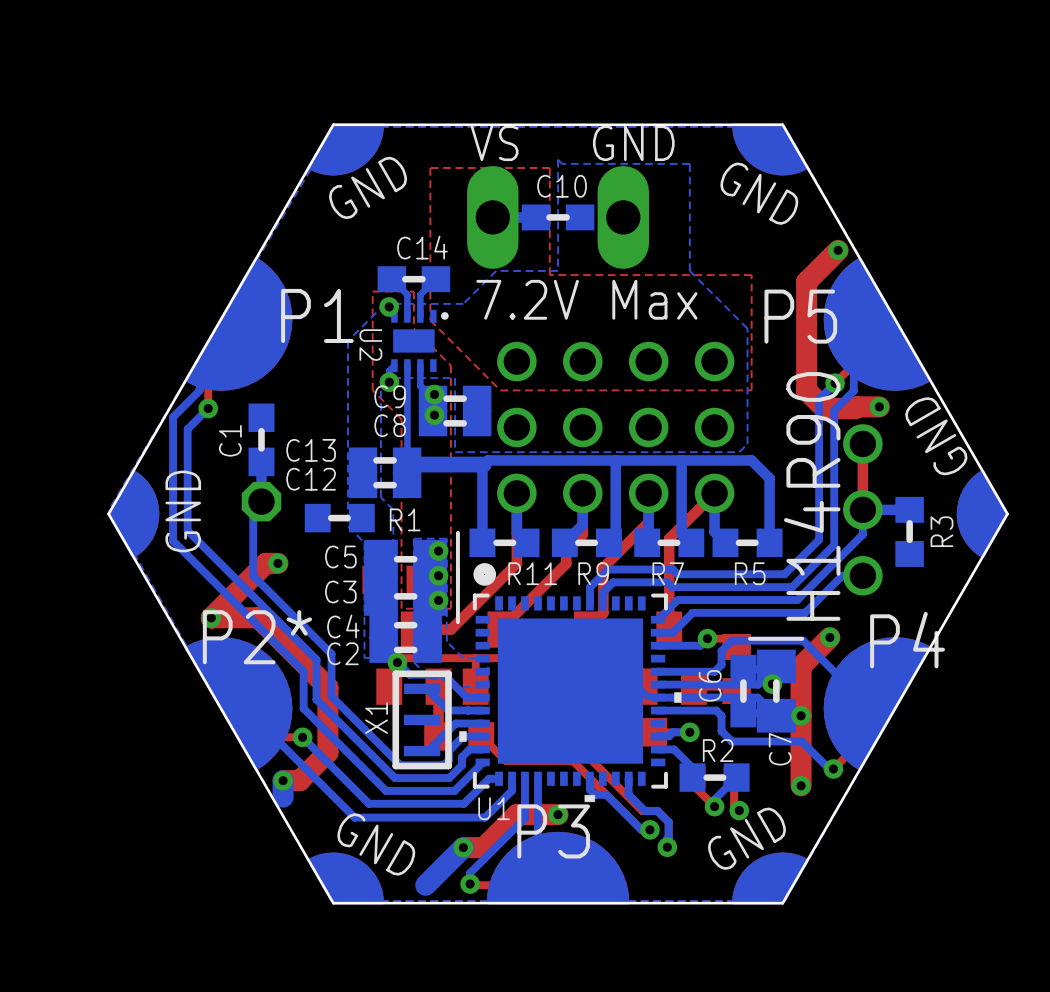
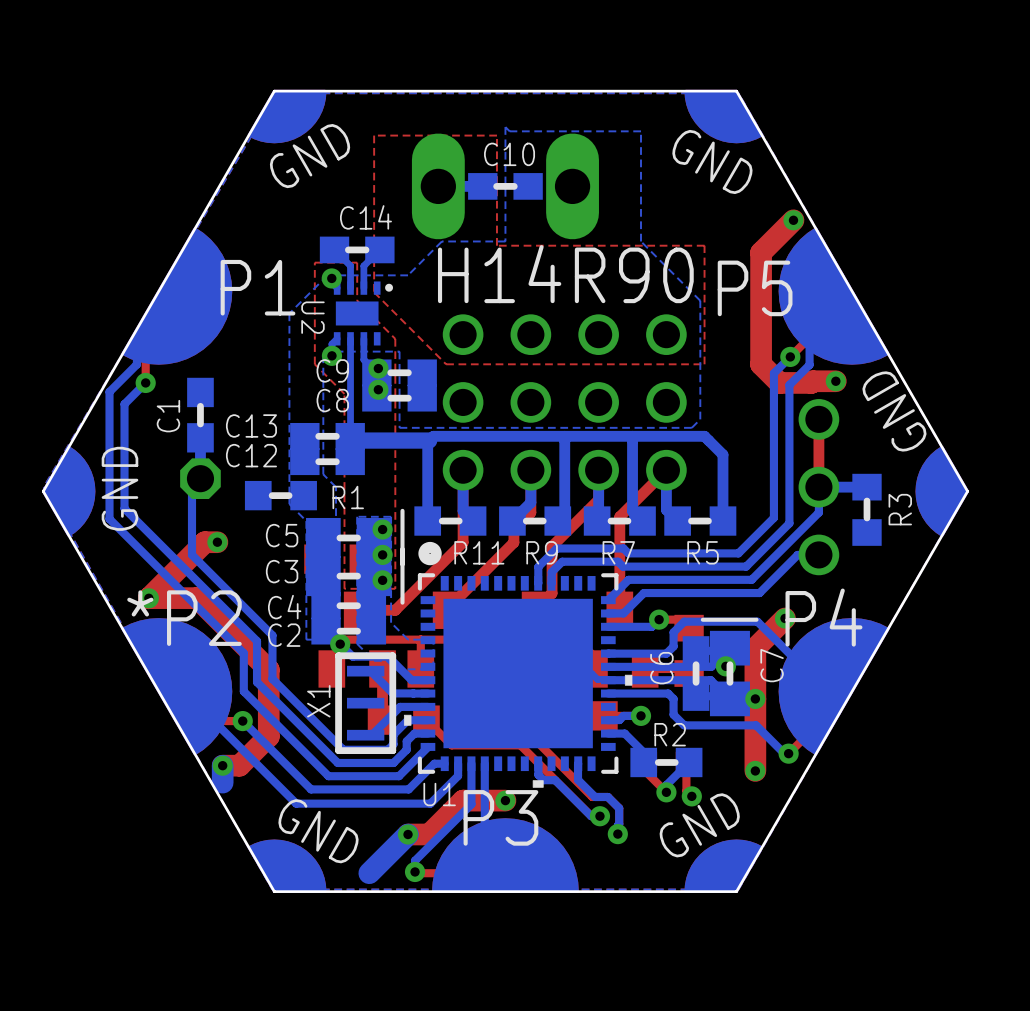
text: VS (494, 143) -> none
text: GND (633, 143) -> none
text: 7.2V Max (586, 299) -> none
text rotation: 0° (812, 496) -> 90° clockwise (565, 274)
text: P2* (257, 637) -> *P2 (184, 618)
text position: P4 (907, 640) -> P4 (823, 617)
C7 name position: C7 (780, 749) -> C7 (772, 665)

